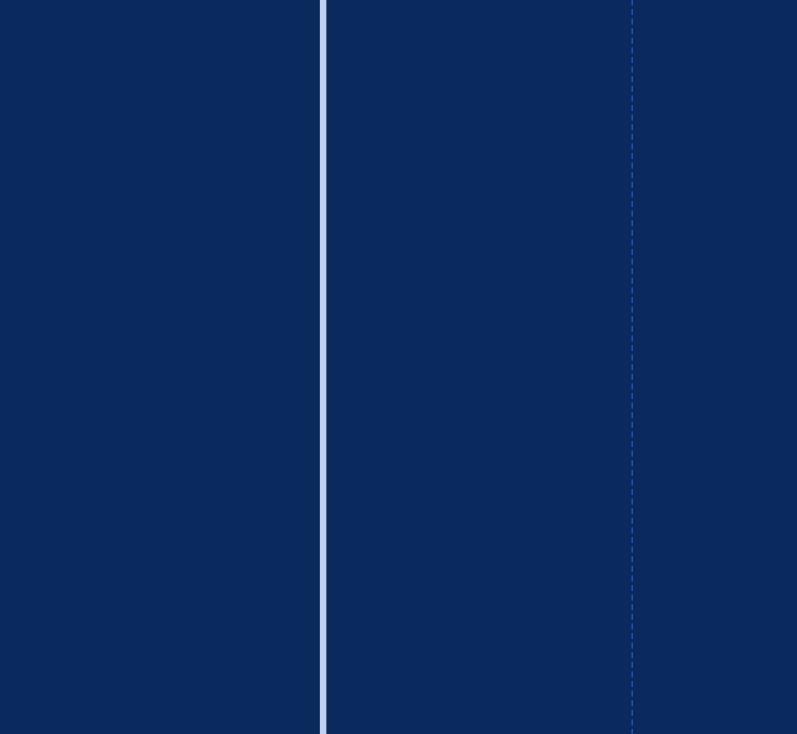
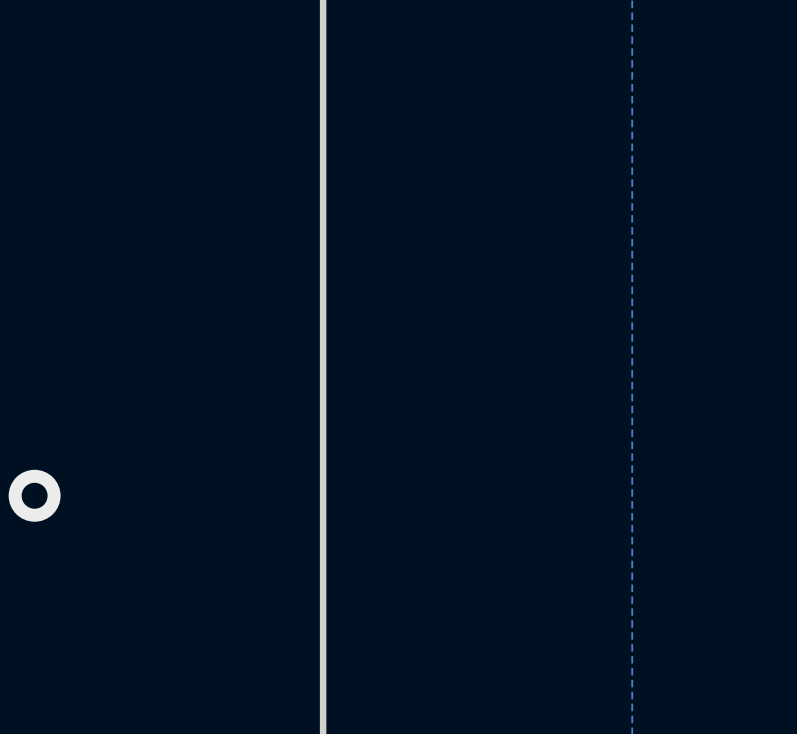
via: none -> (34, 495)

